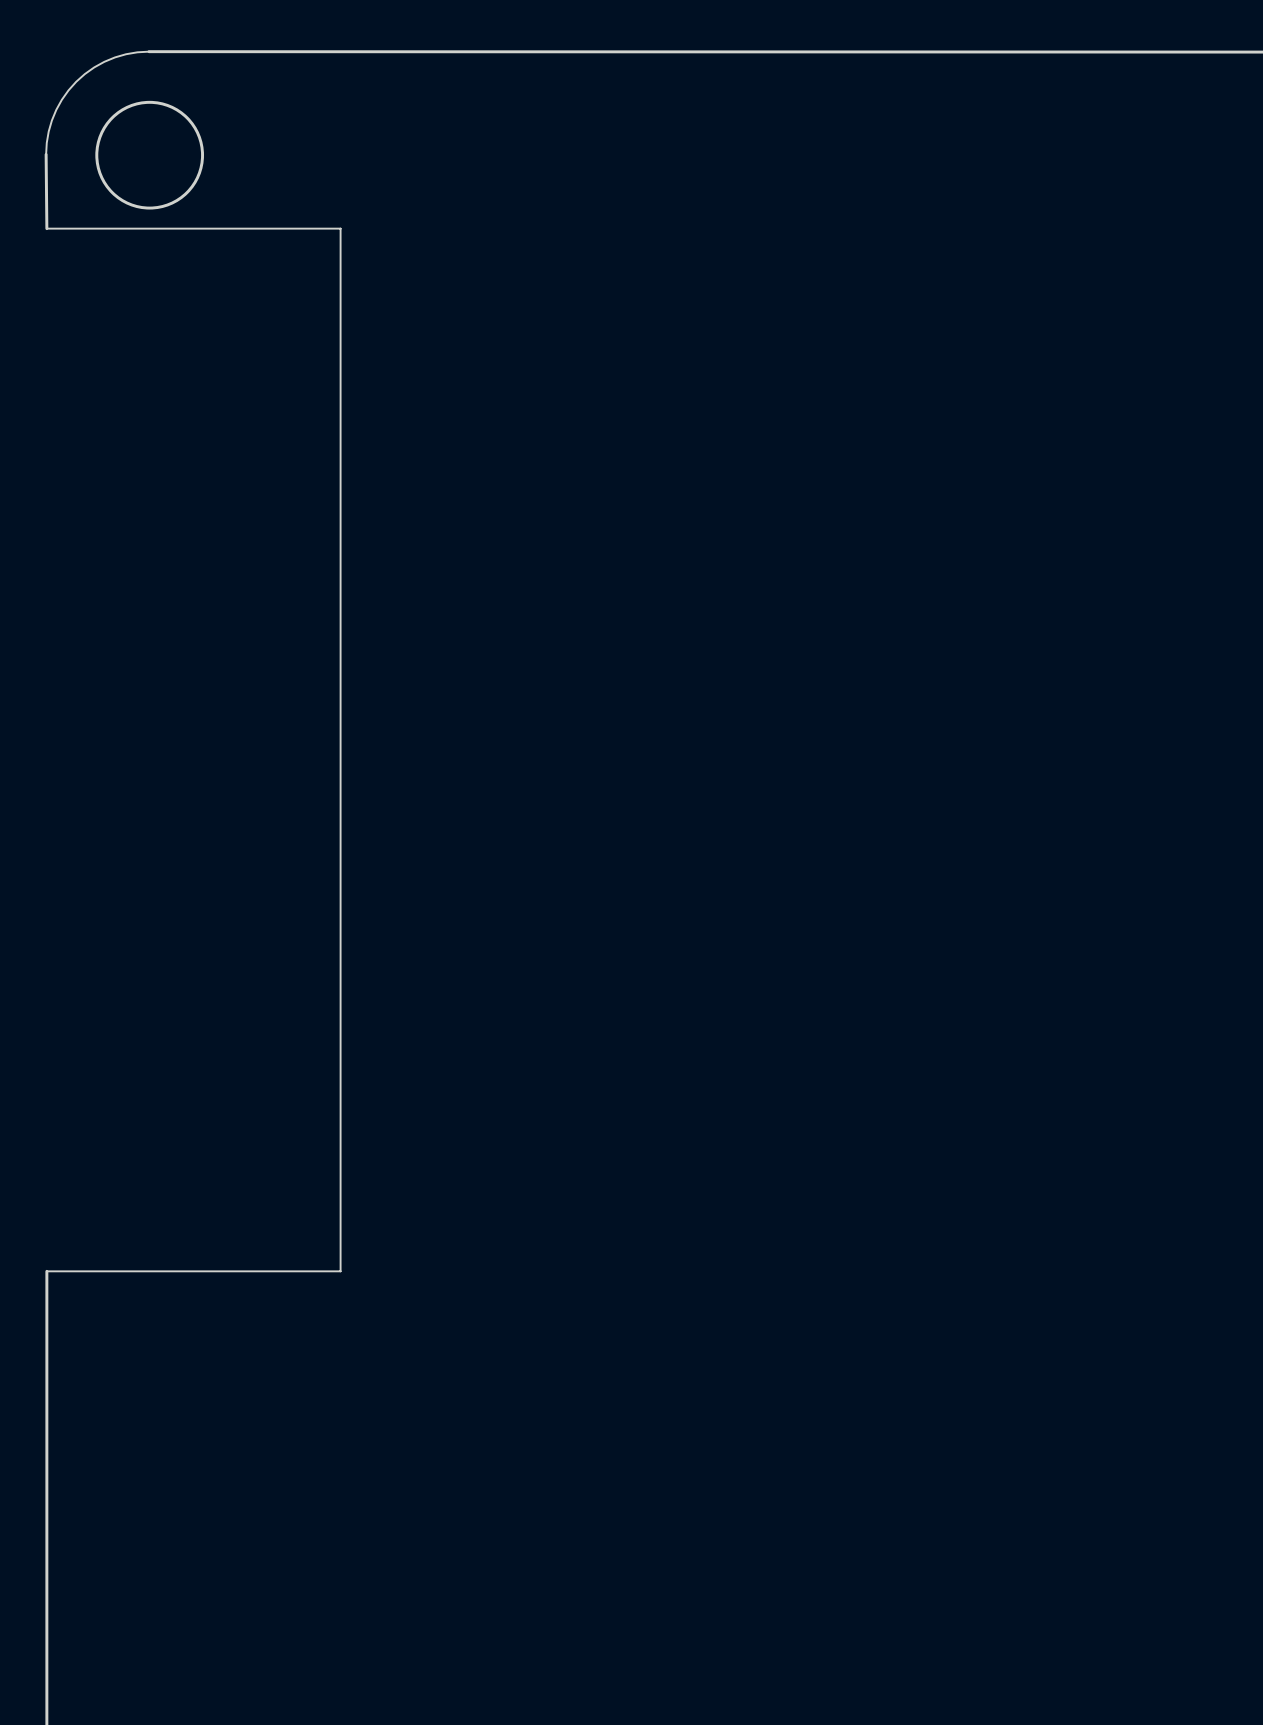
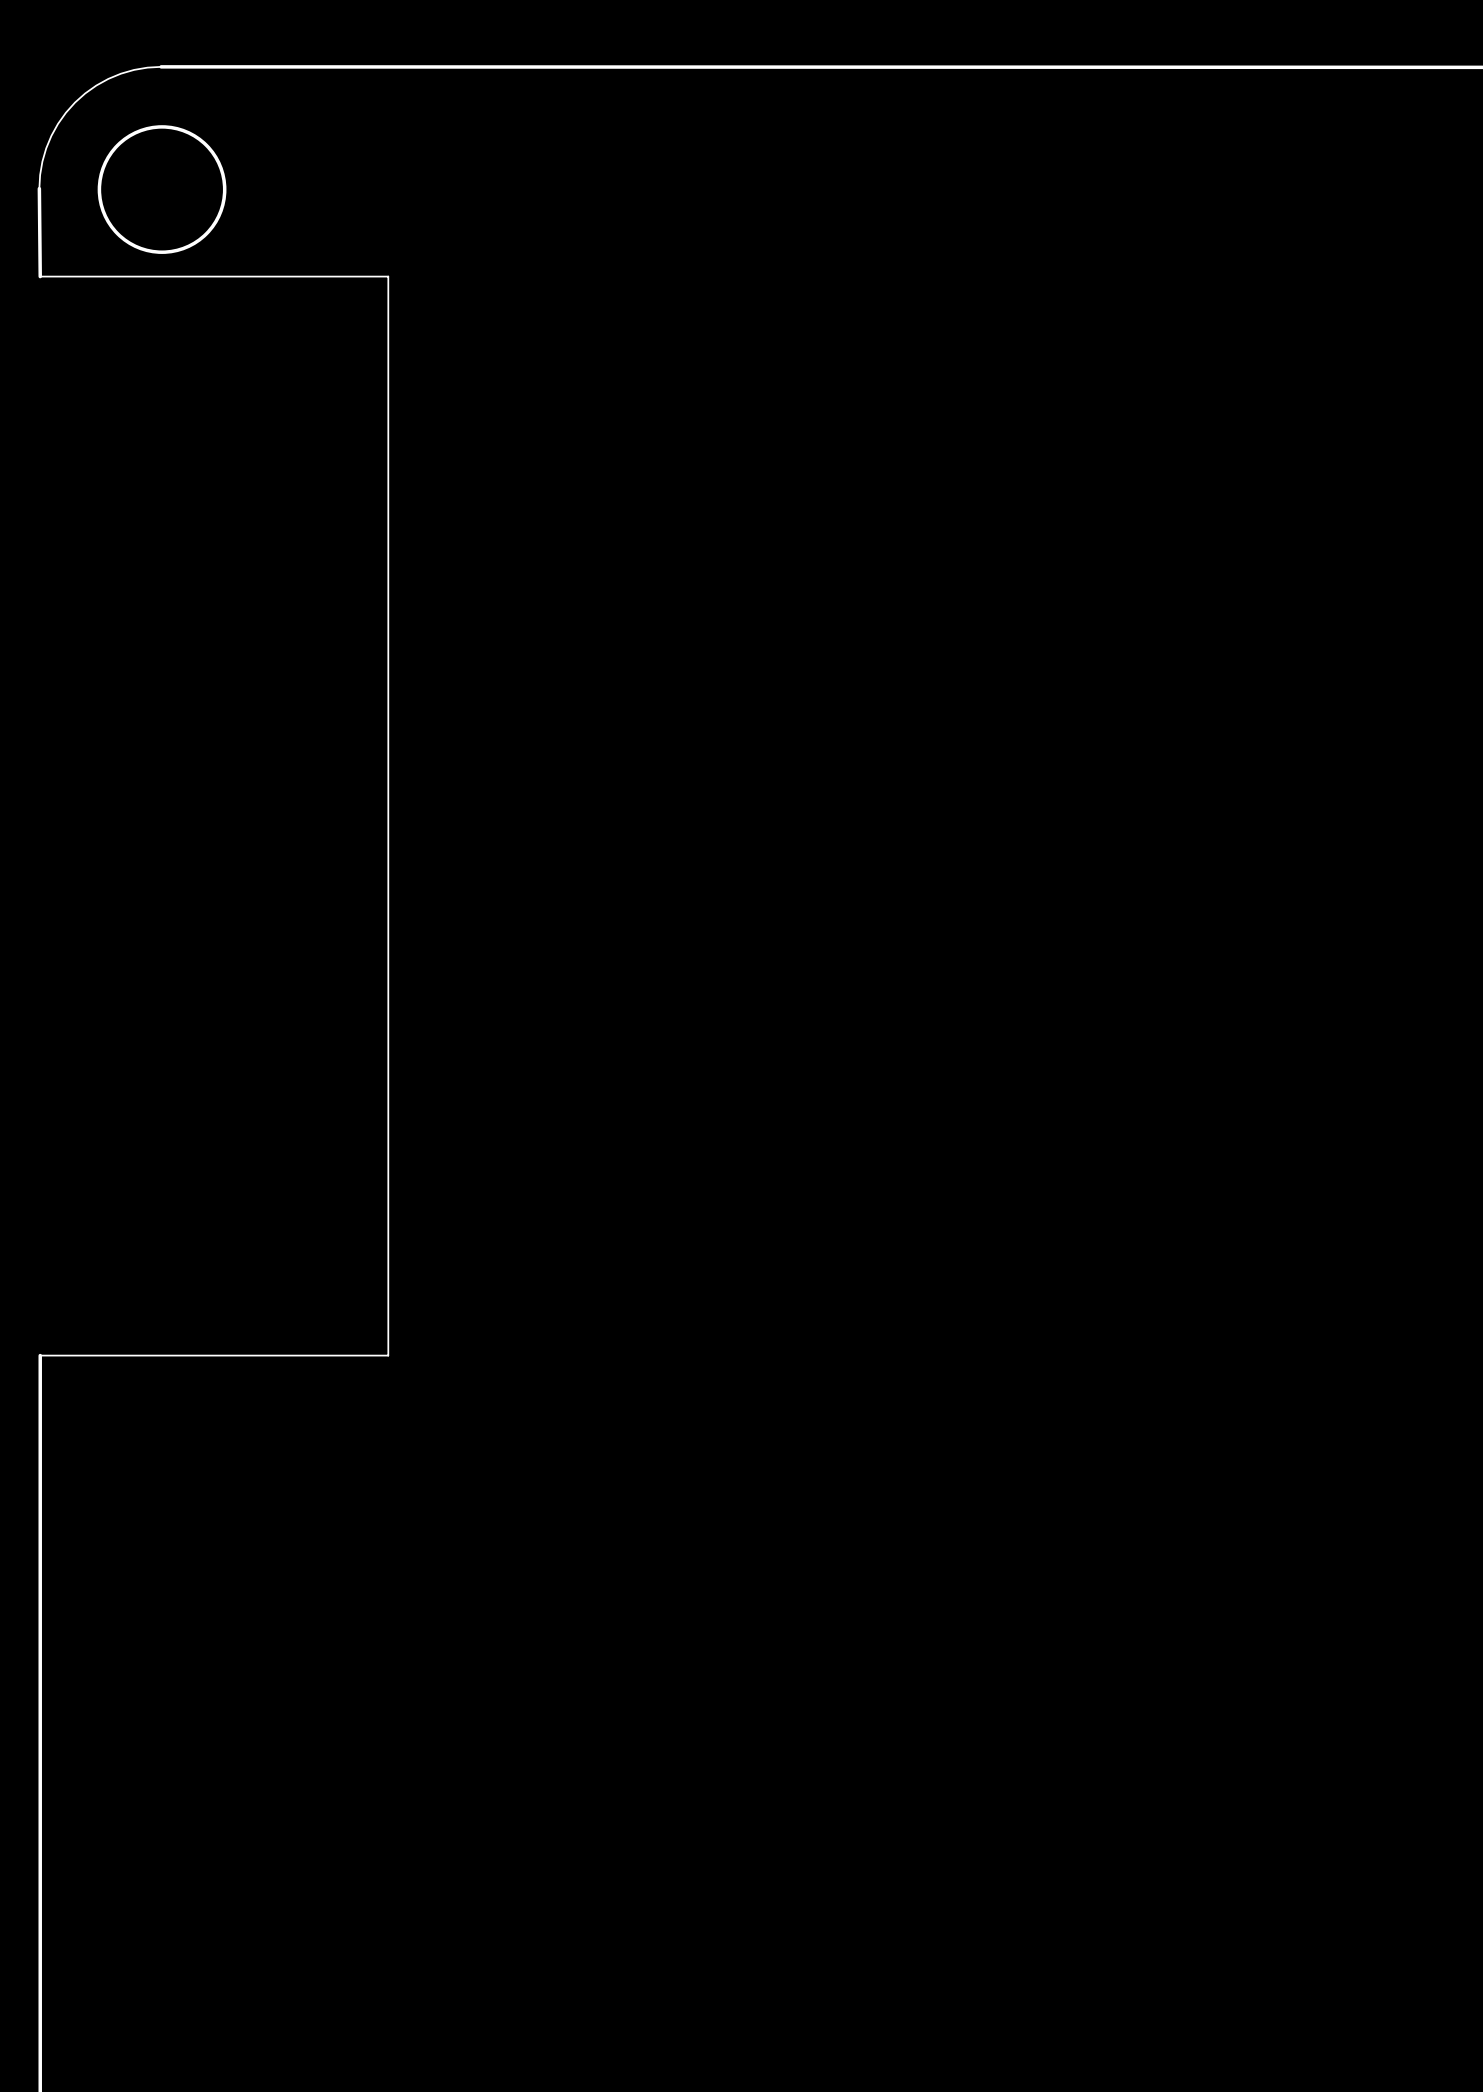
board edge: (340, 1139) (340, 1271) (46, 1271) -> (388, 1355) (40, 1355) (40, 1512)

